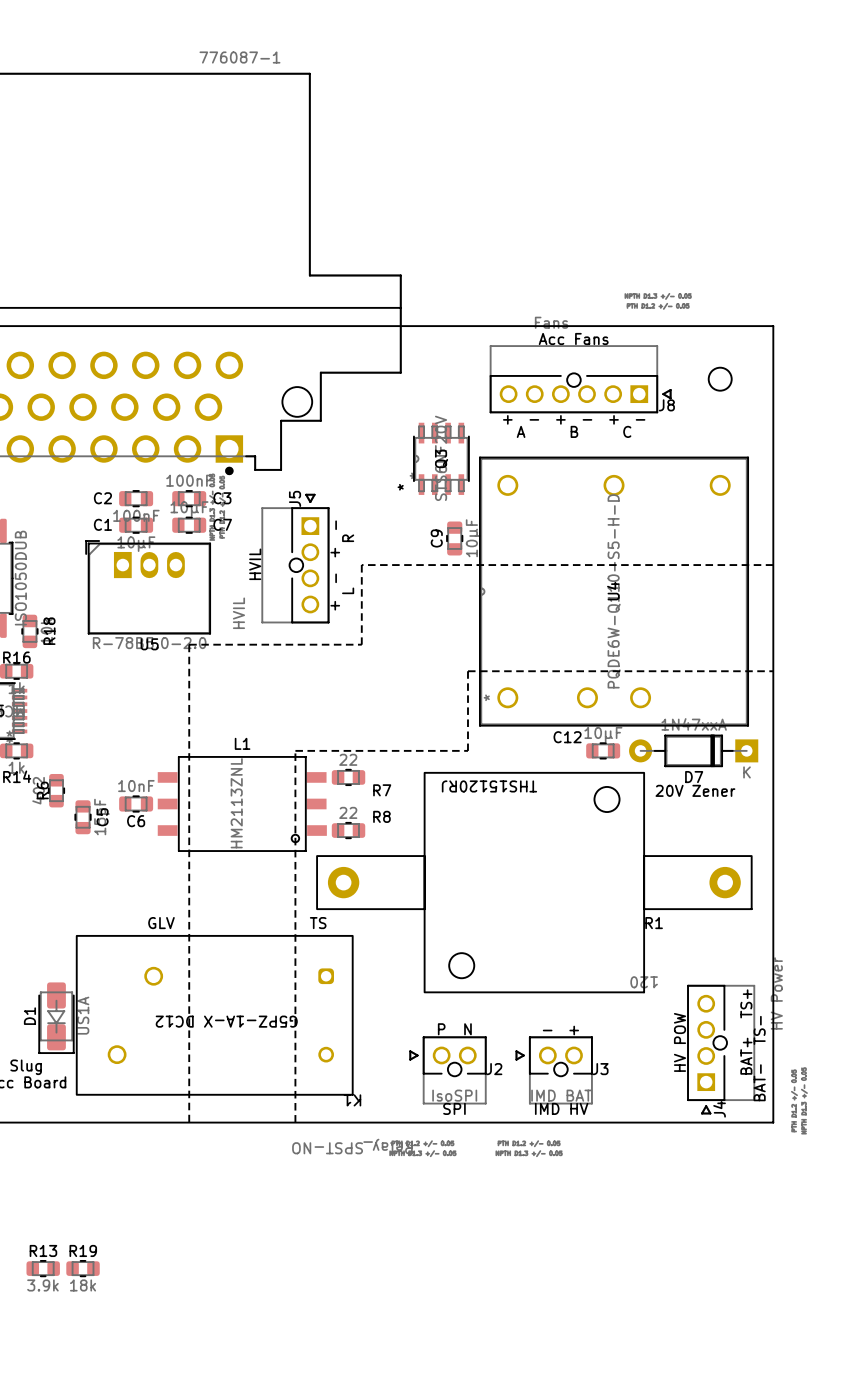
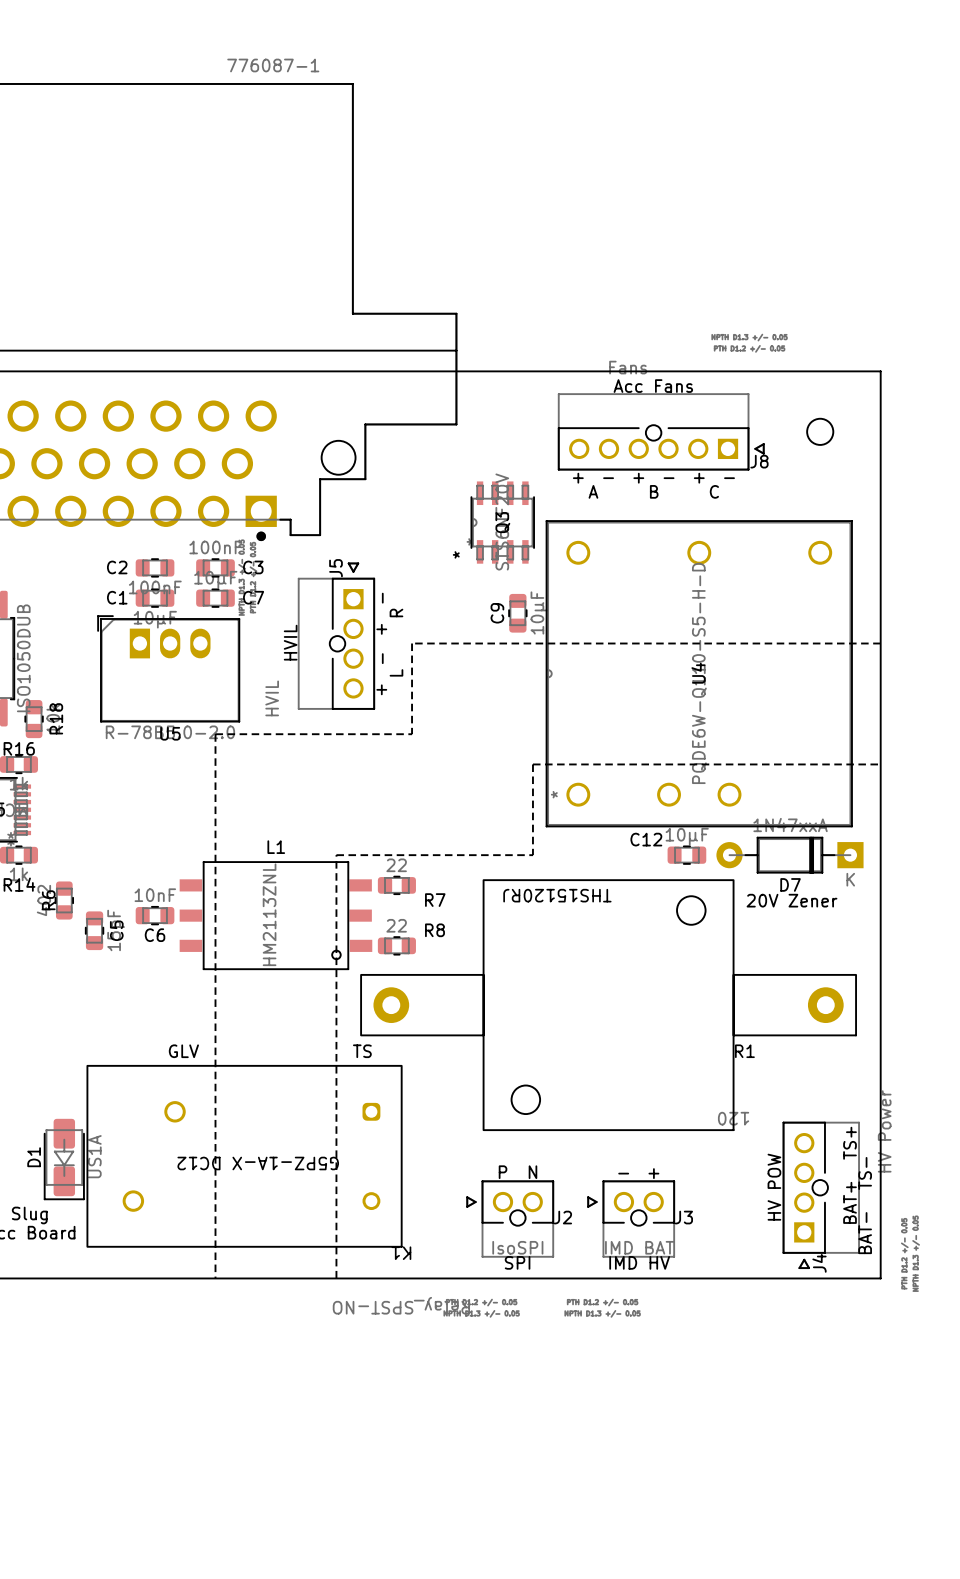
R13: 3.9k (43, 1268) -> none
R19: 18k (83, 1268) -> none

